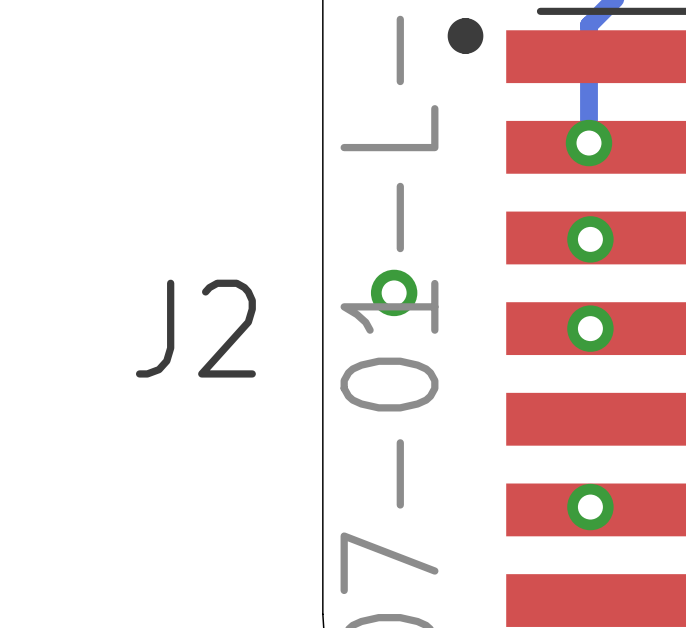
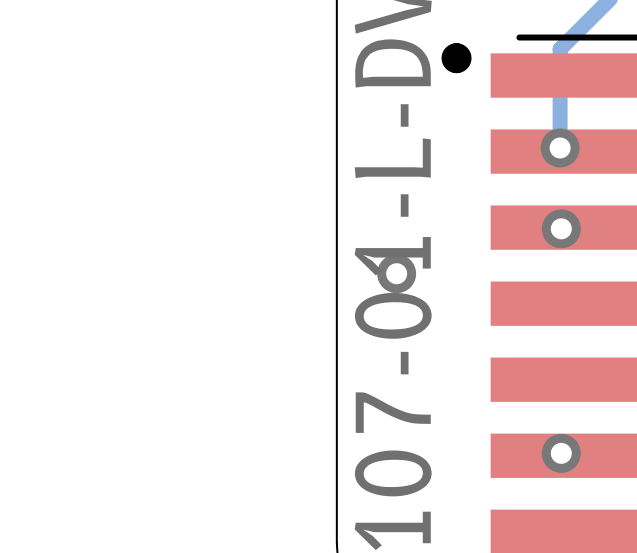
J2 name: J2 (195, 328) -> none
via: (590, 328) -> none

